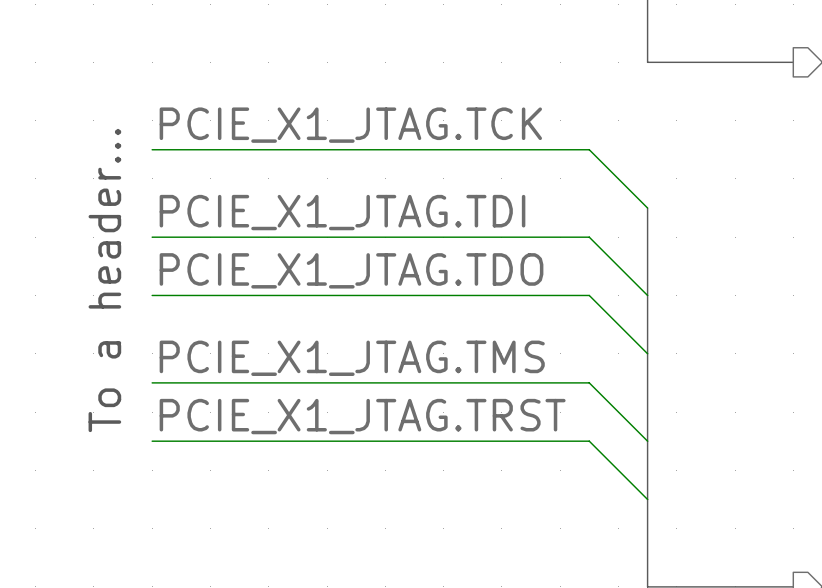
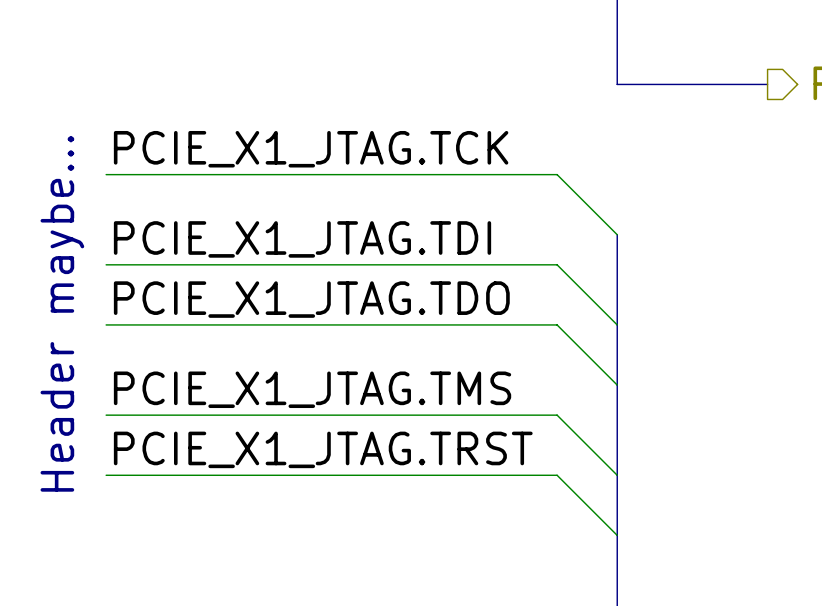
text: To a header... (104, 280) -> none
text: none -> Header maybe... (62, 313)

